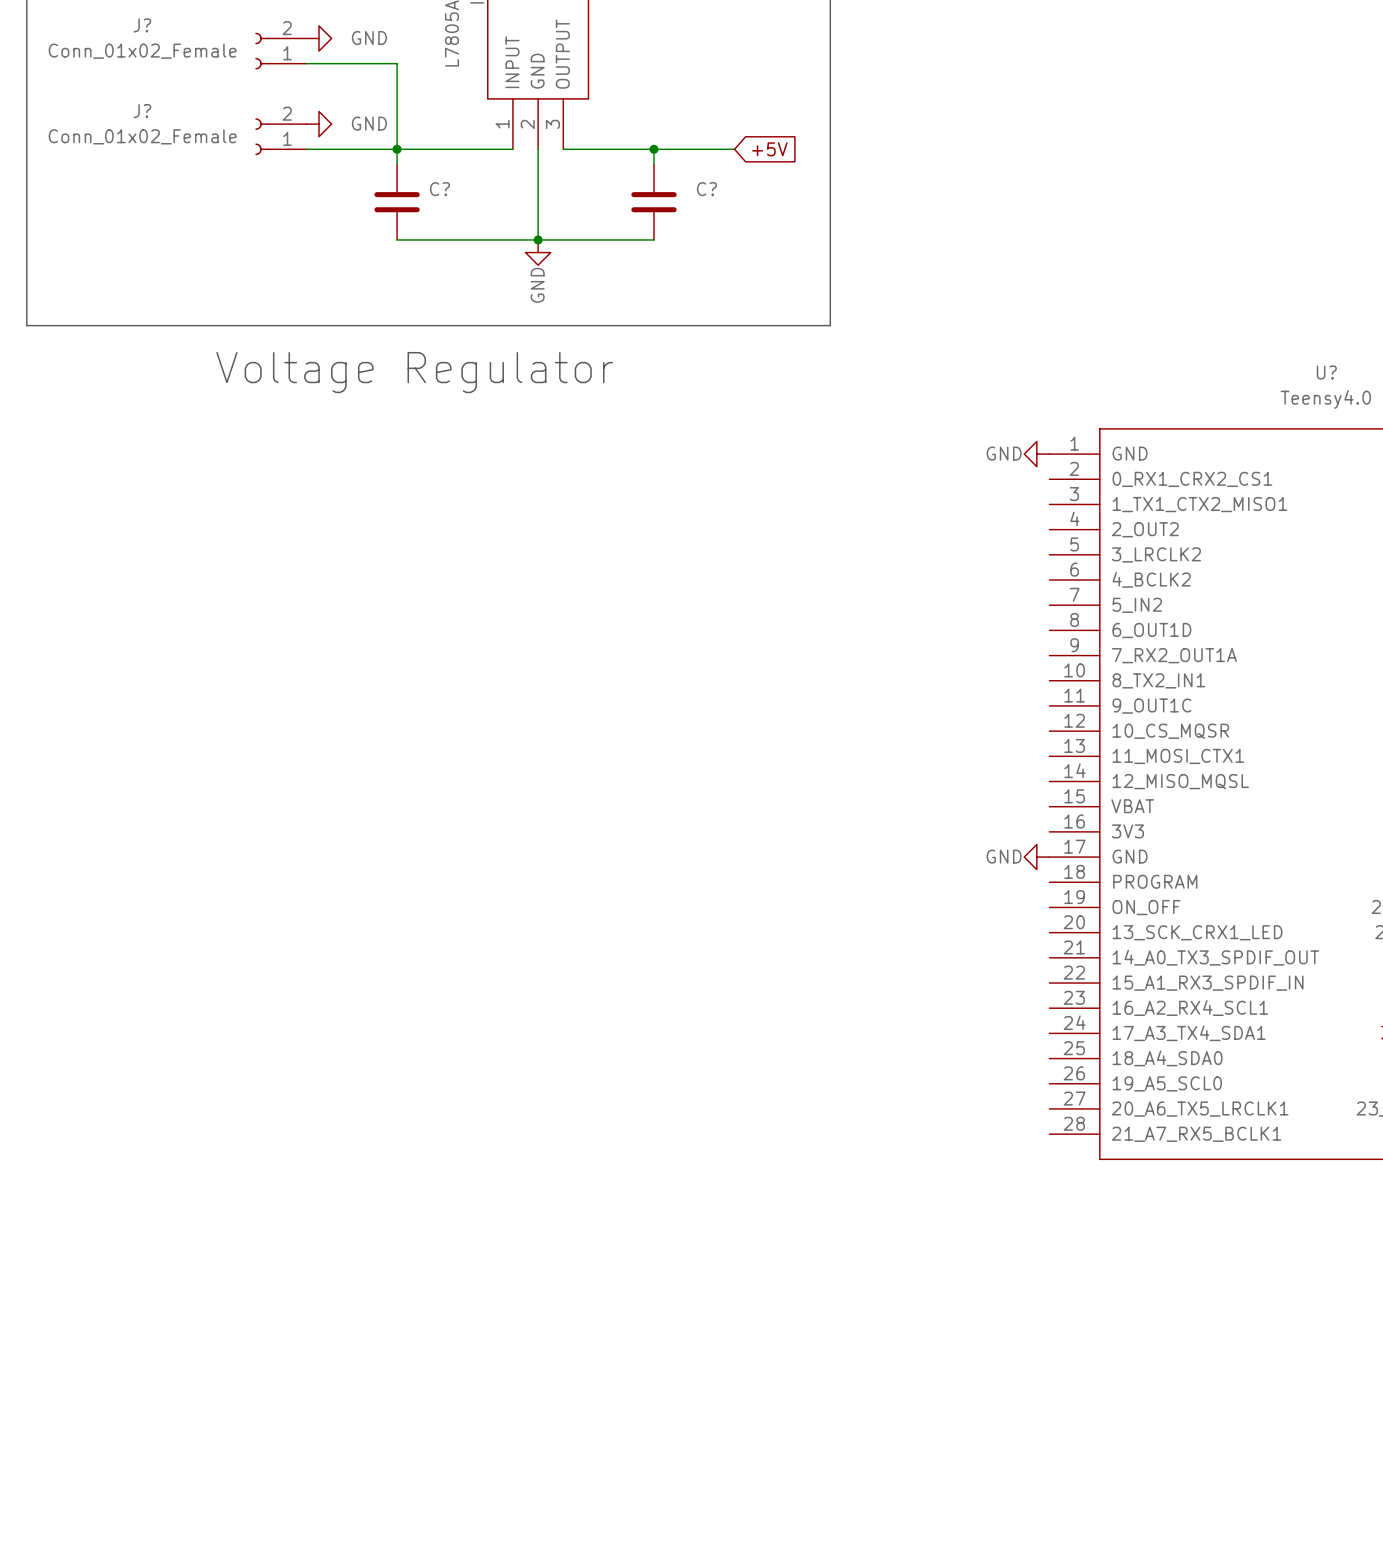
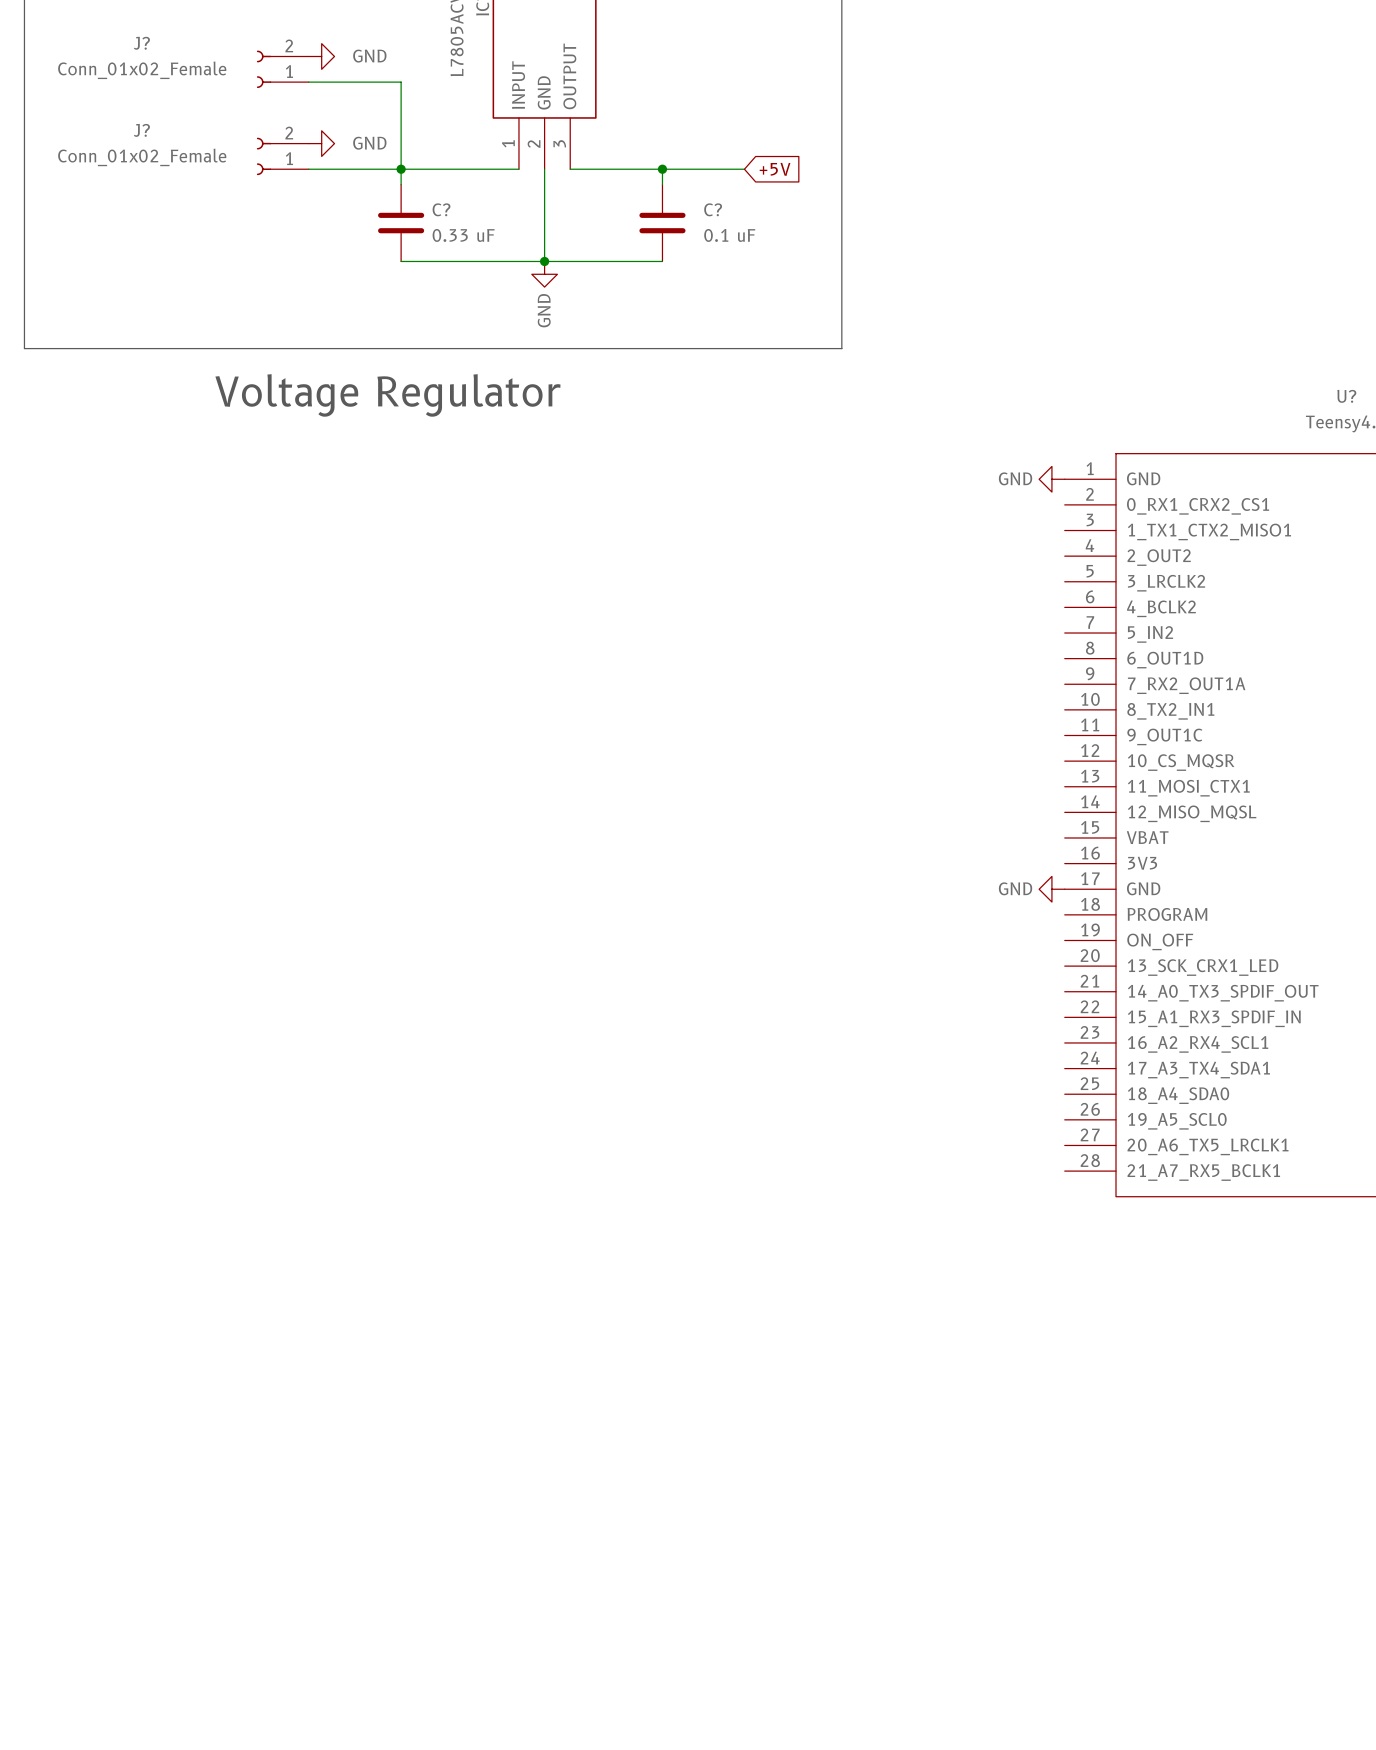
C? value: none -> 0.33 uF (463, 235)
C? value: none -> 0.1 uF (729, 235)

